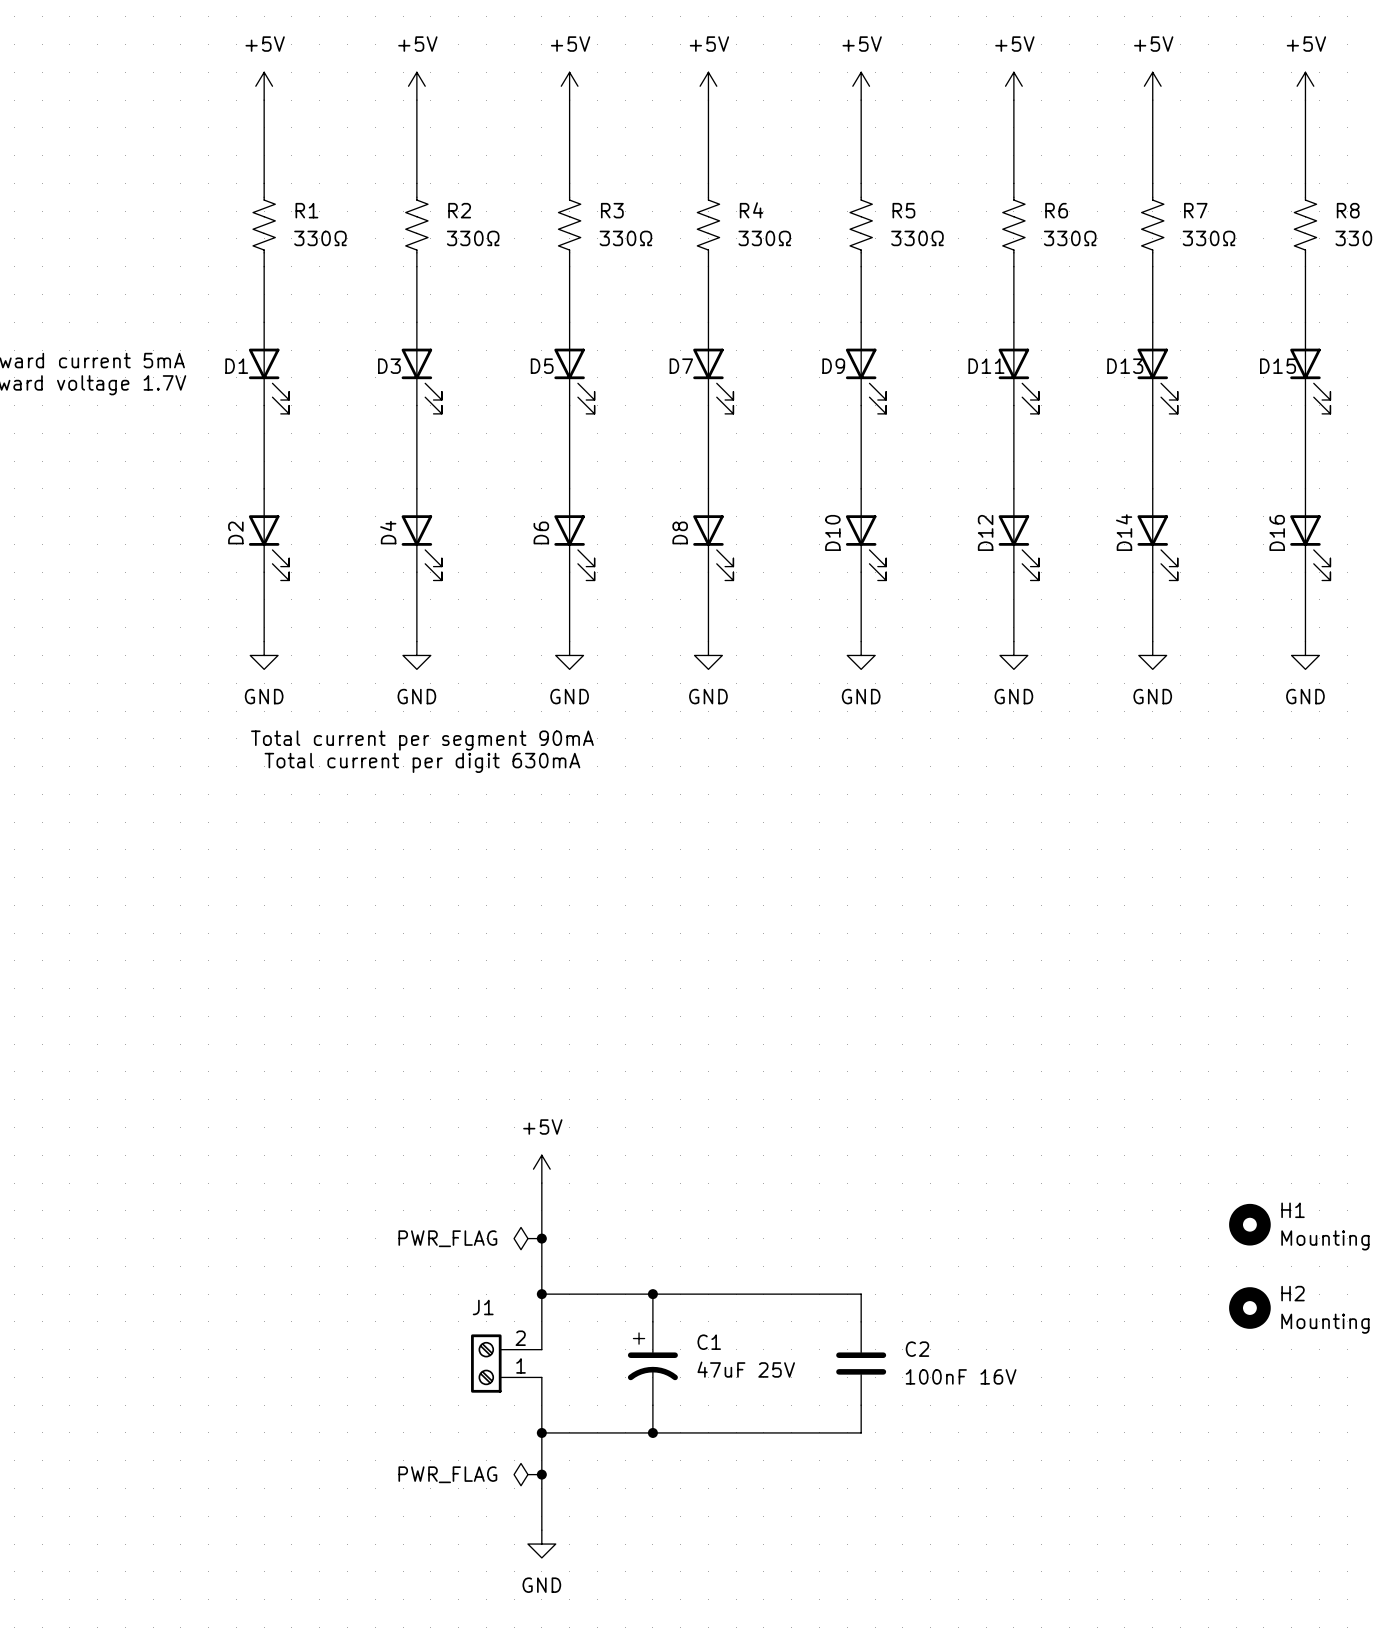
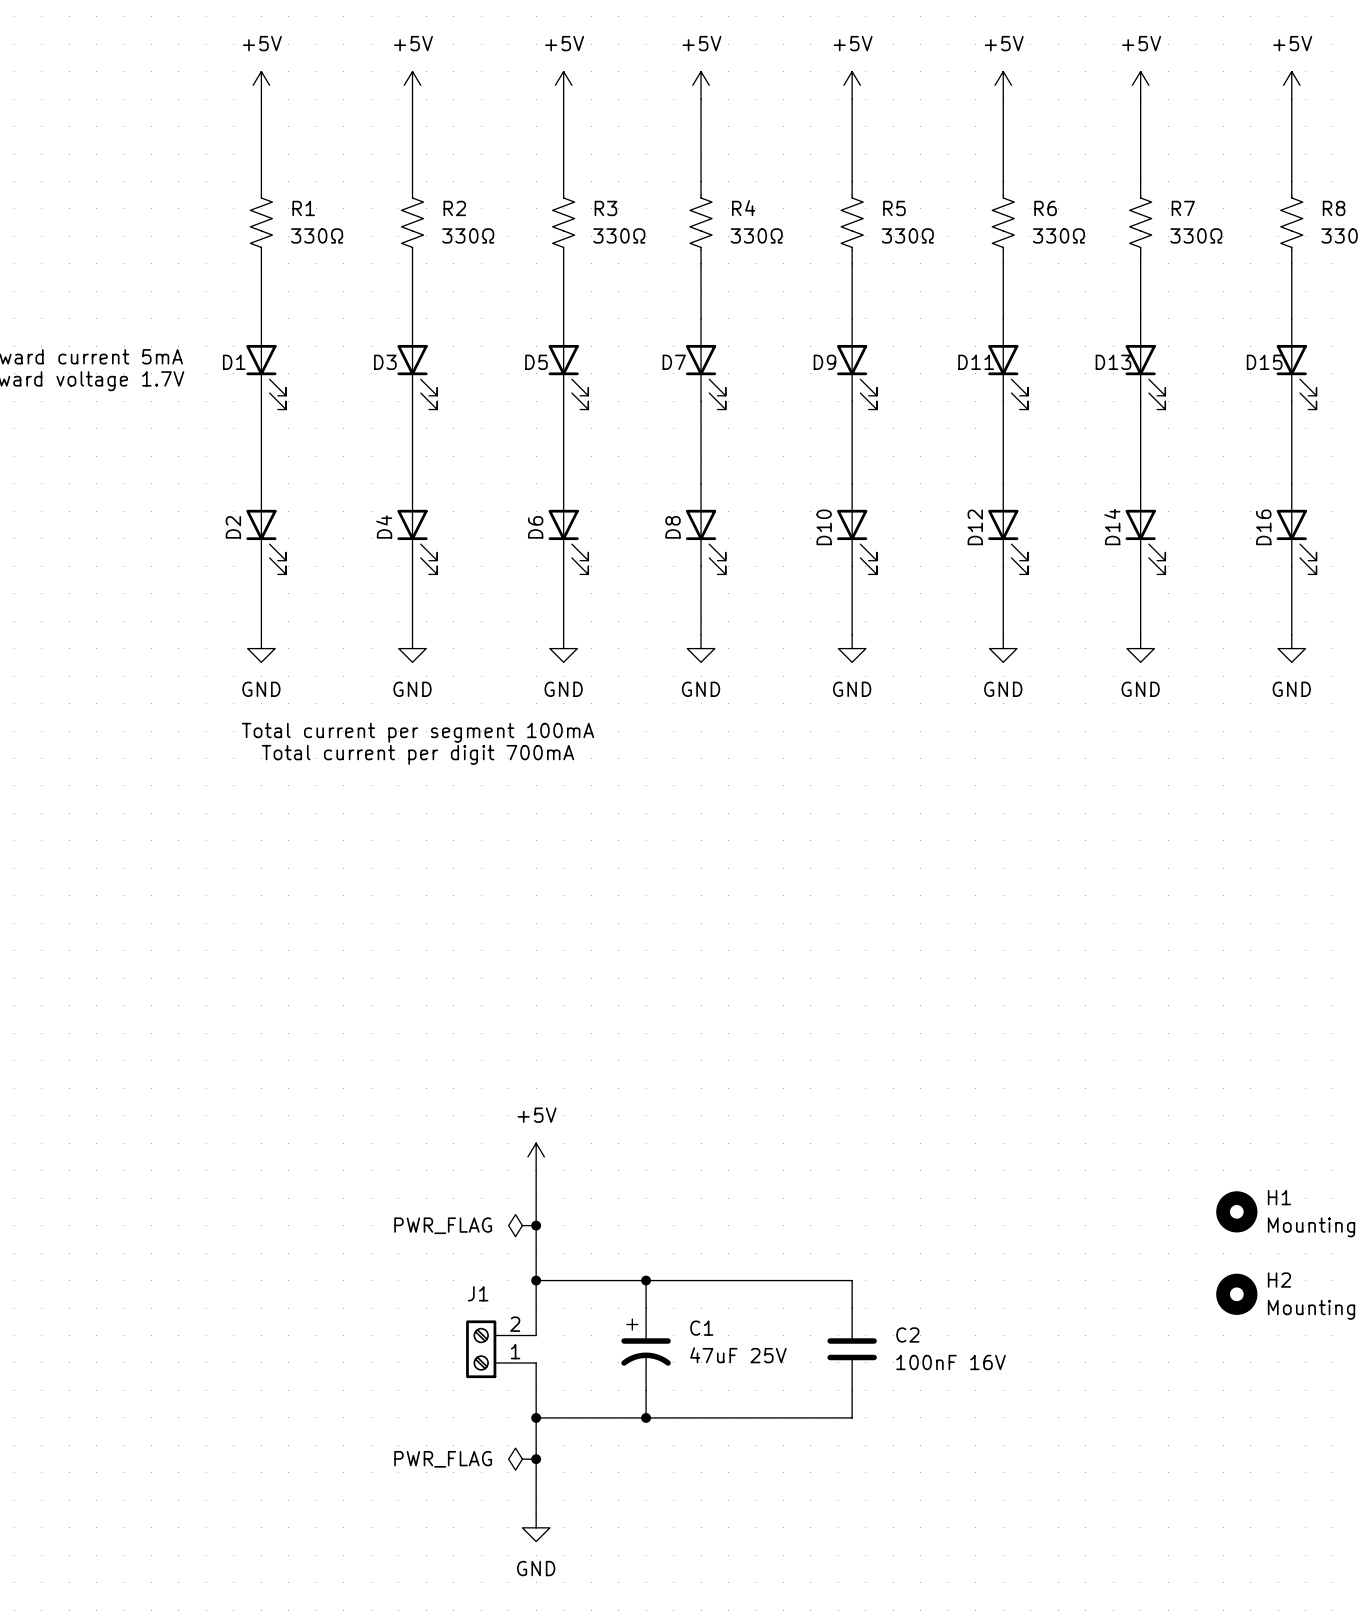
text: Total current per segment 90mA (422, 740) -> Total current per segment 100mA (418, 732)
text: Total current per digit 630mA (422, 762) -> Total current per digit 700mA (418, 754)

